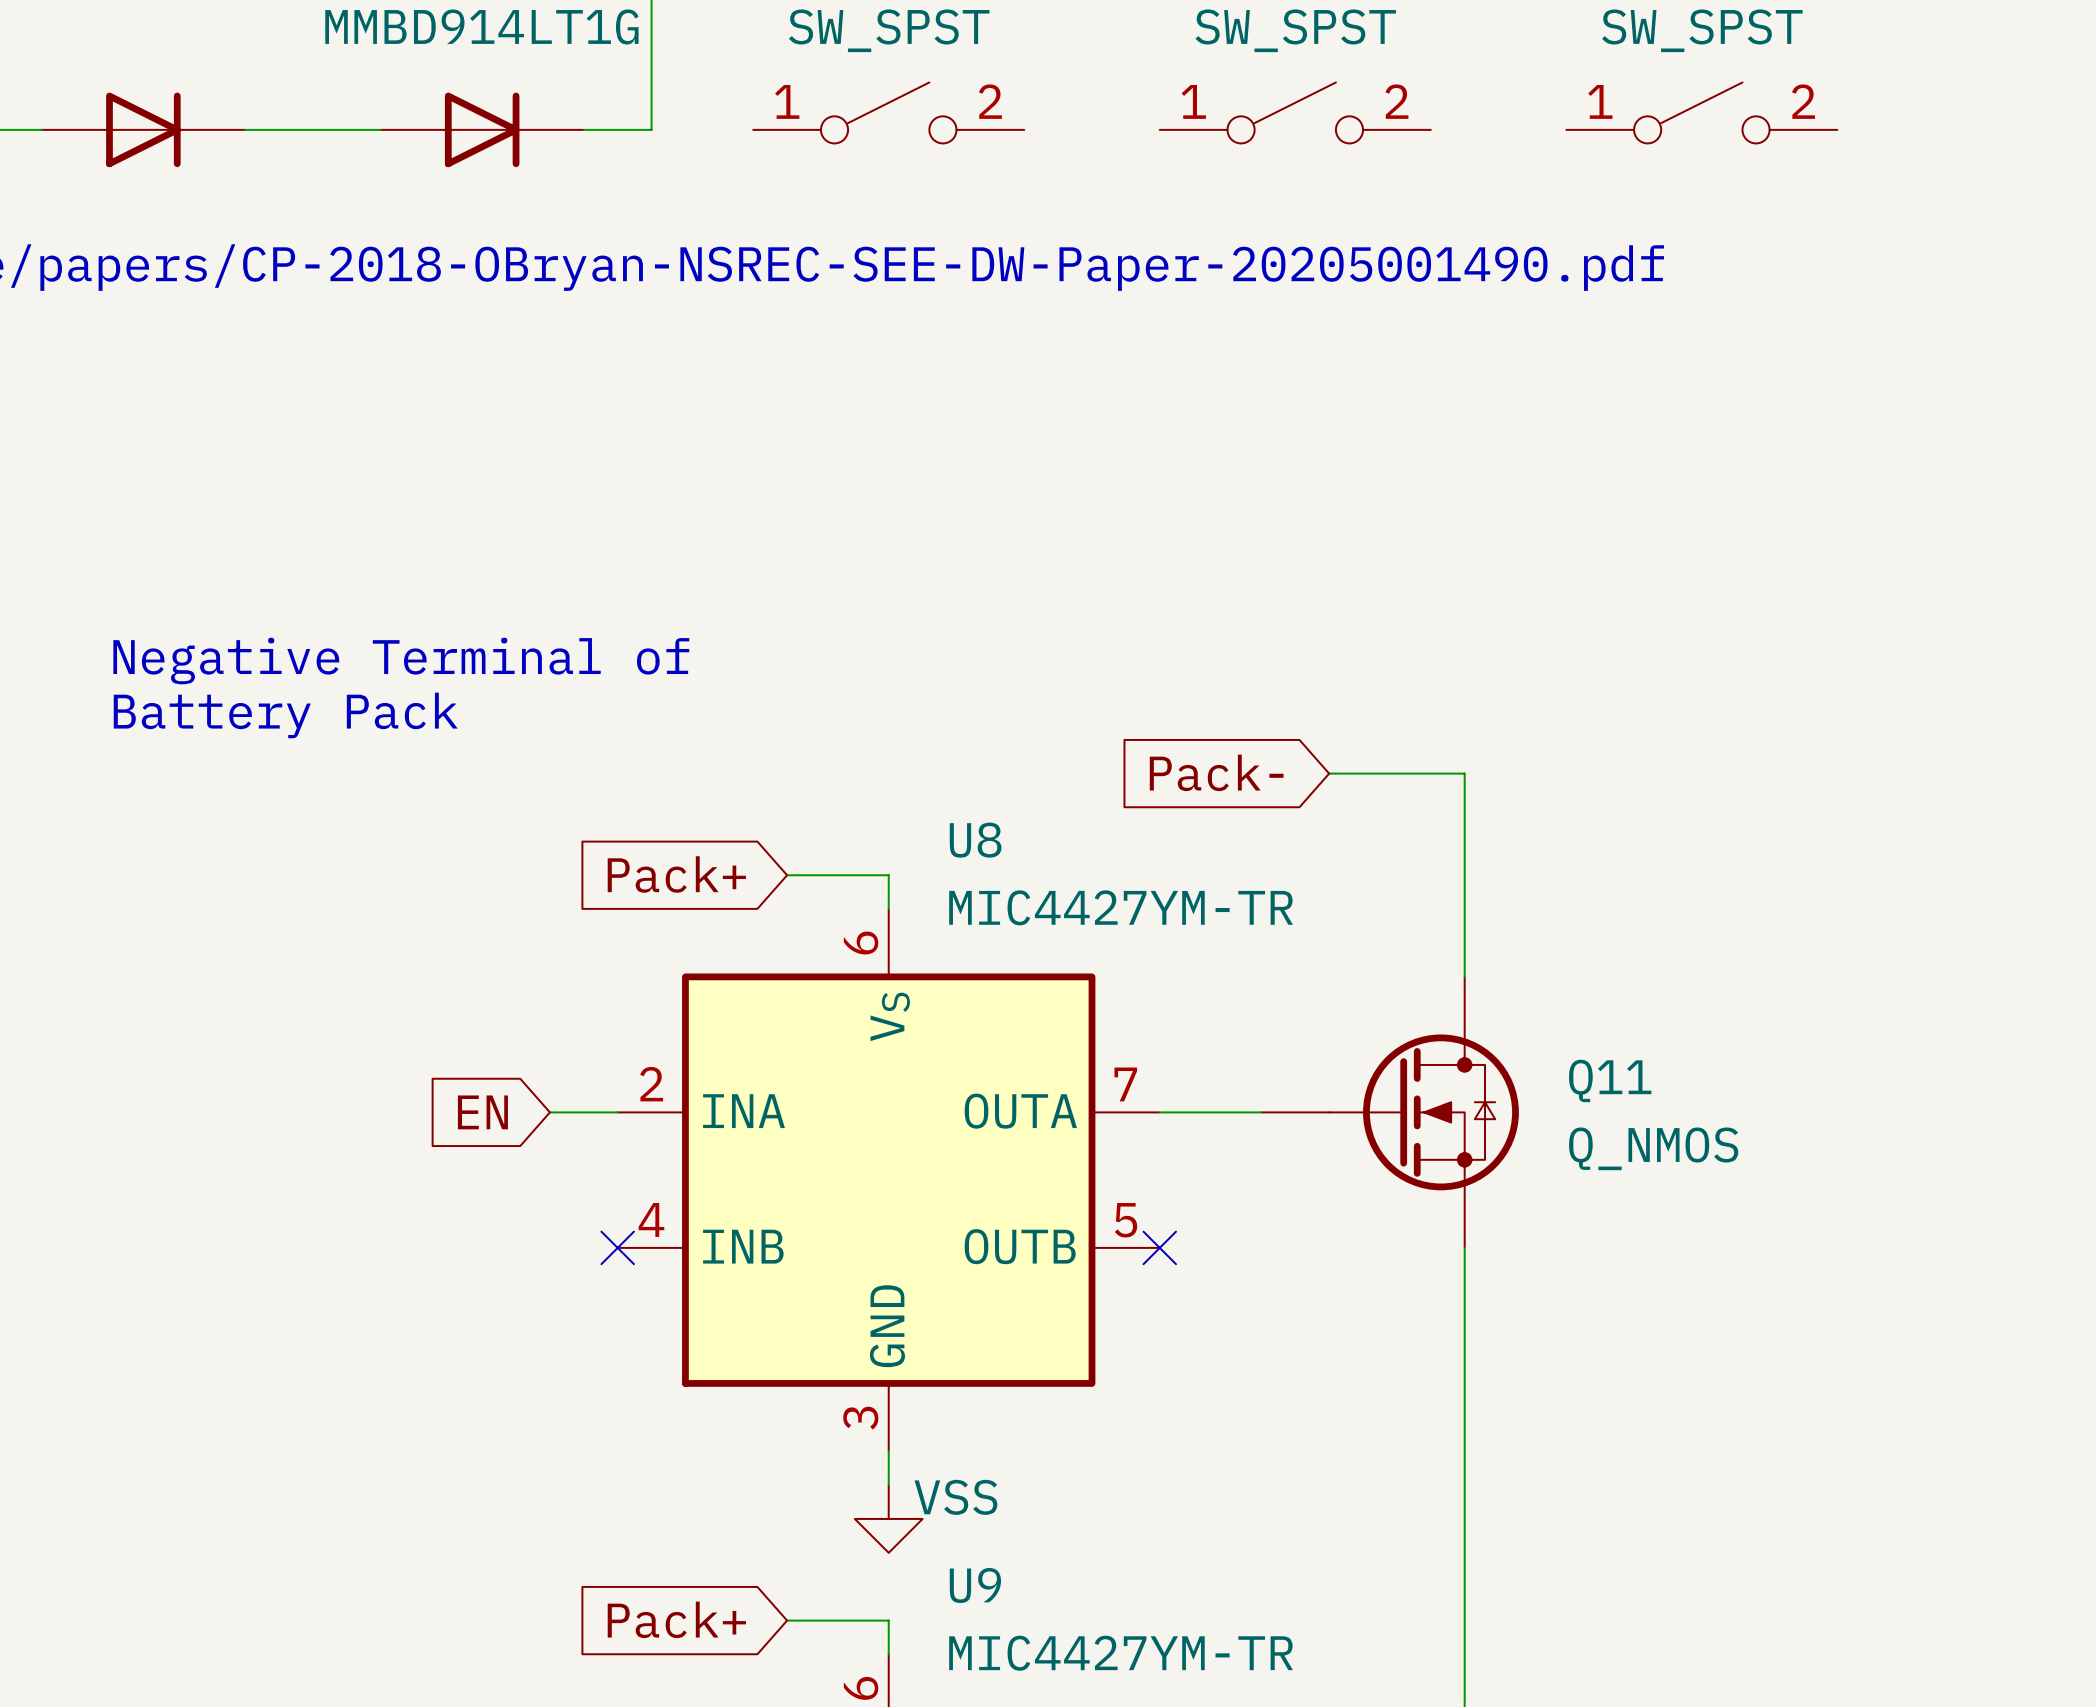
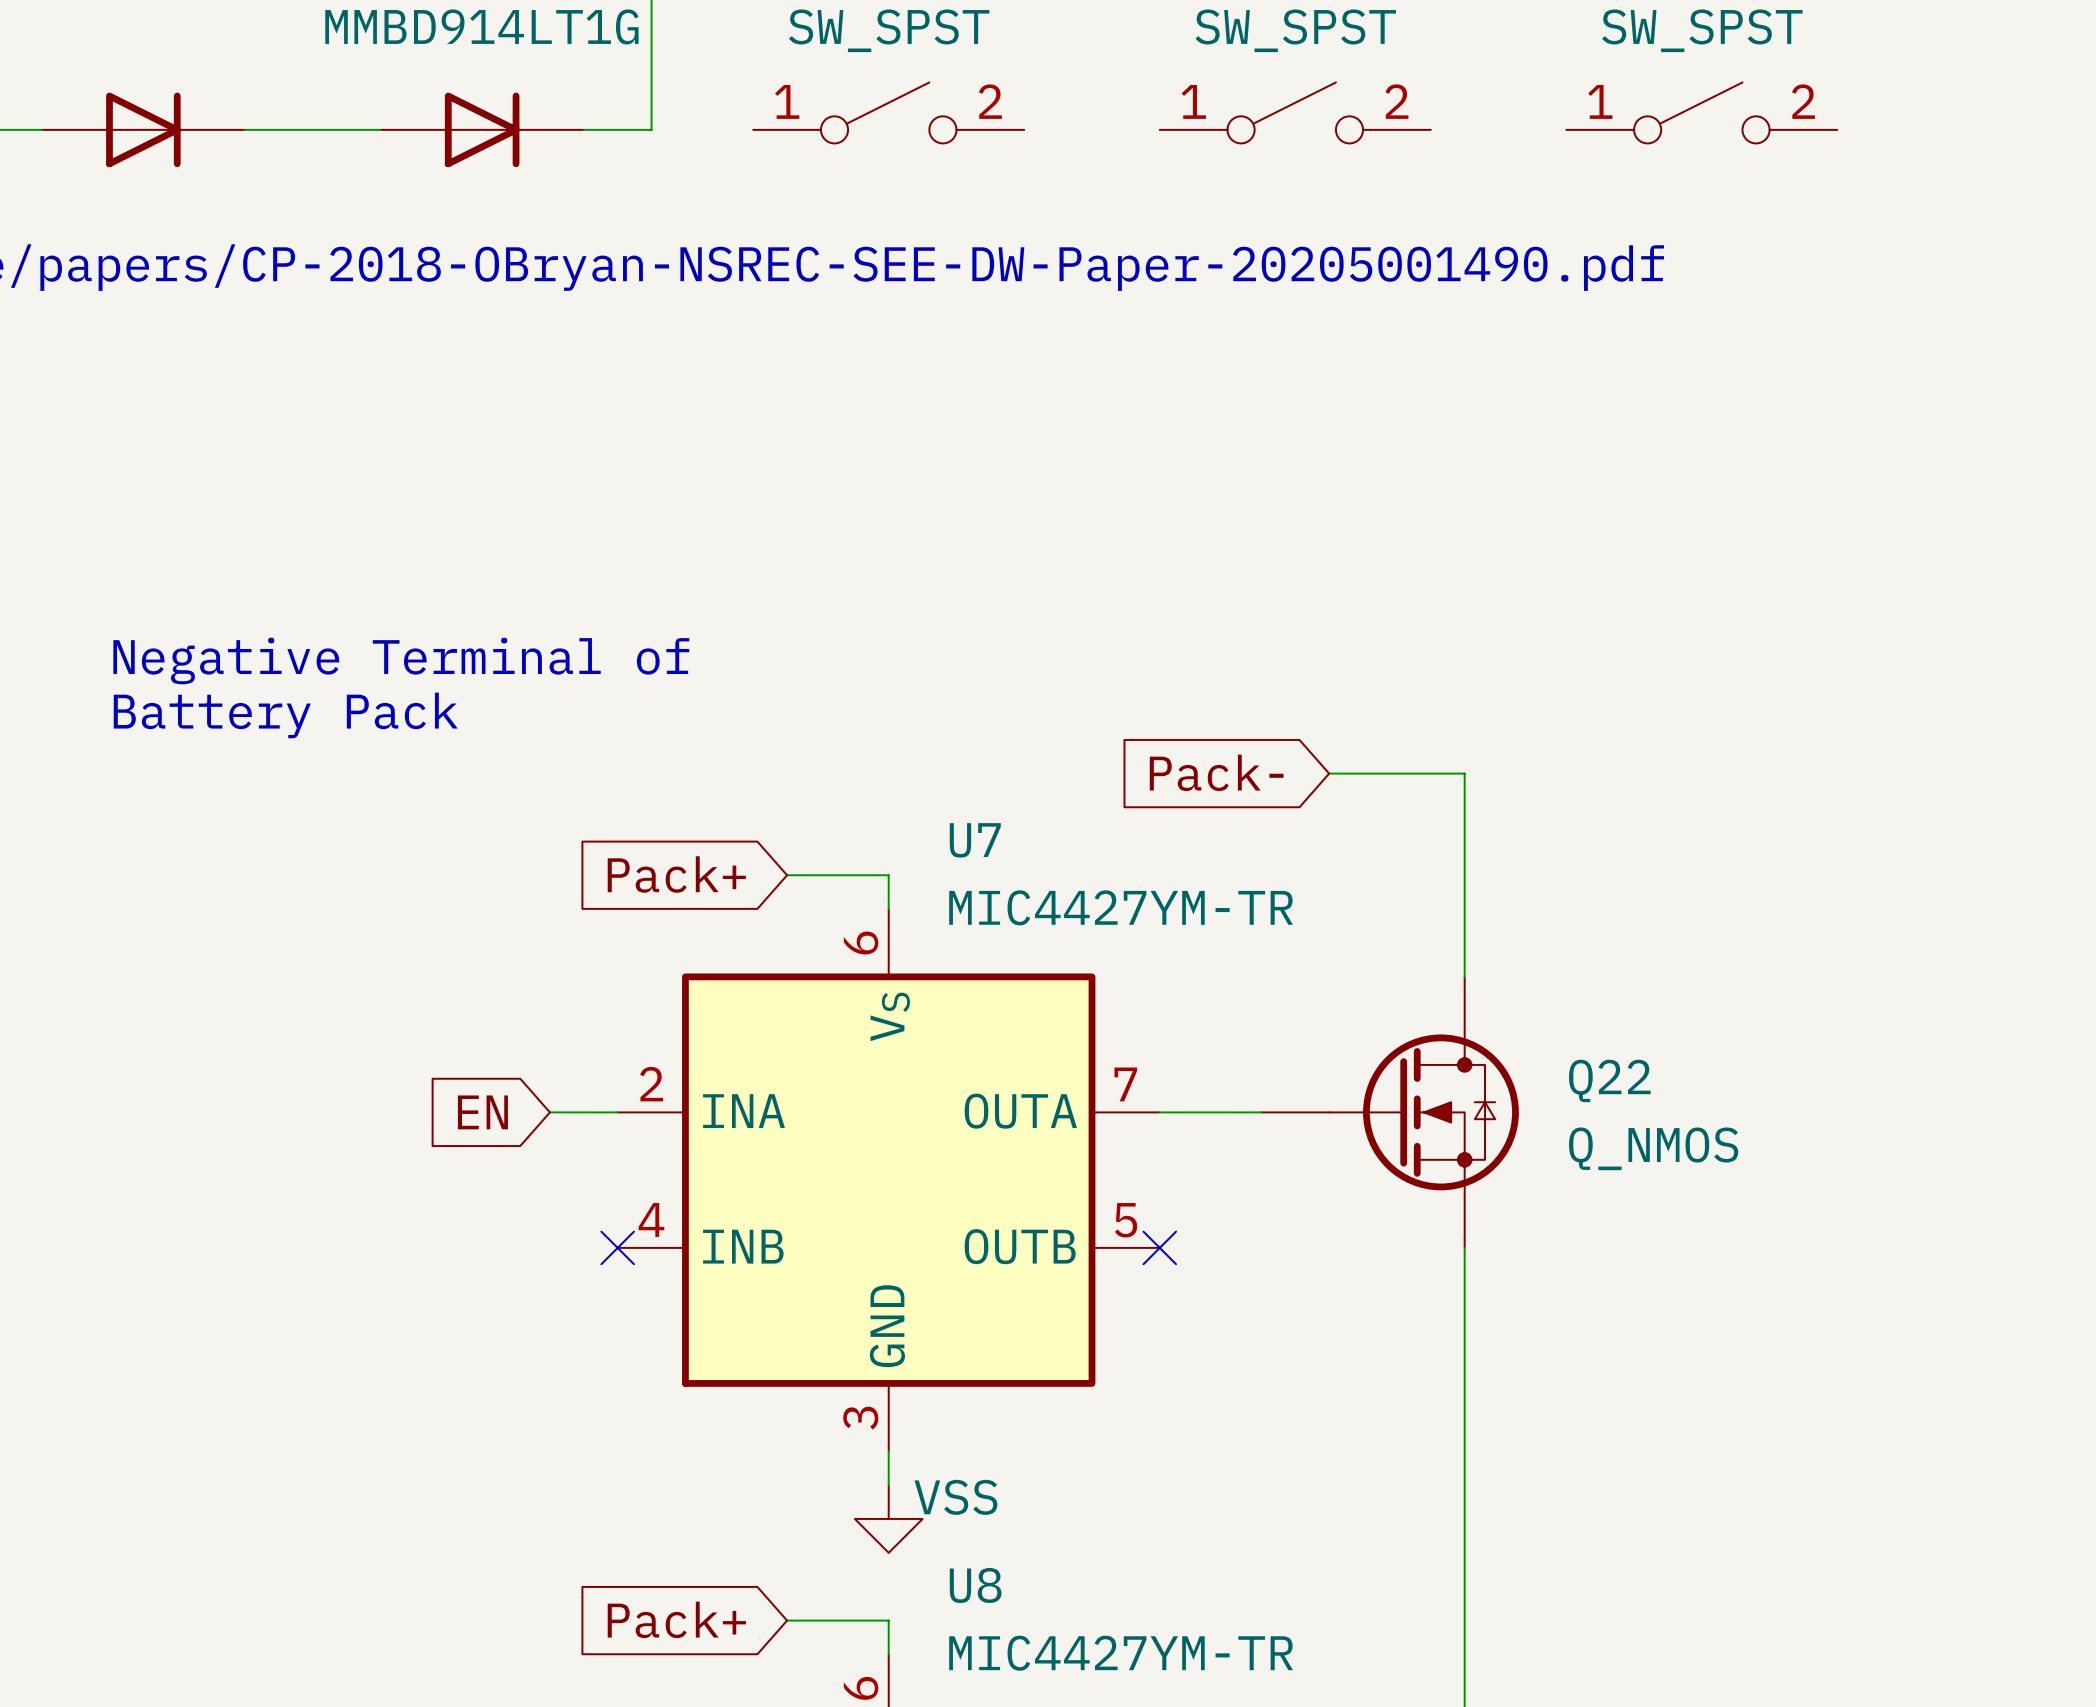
U8 name: U8 (975, 840) -> U7 (975, 840)
Q11 name: Q11 (1610, 1080) -> Q22 (1609, 1080)
U9 name: U9 (975, 1585) -> U8 (975, 1585)

